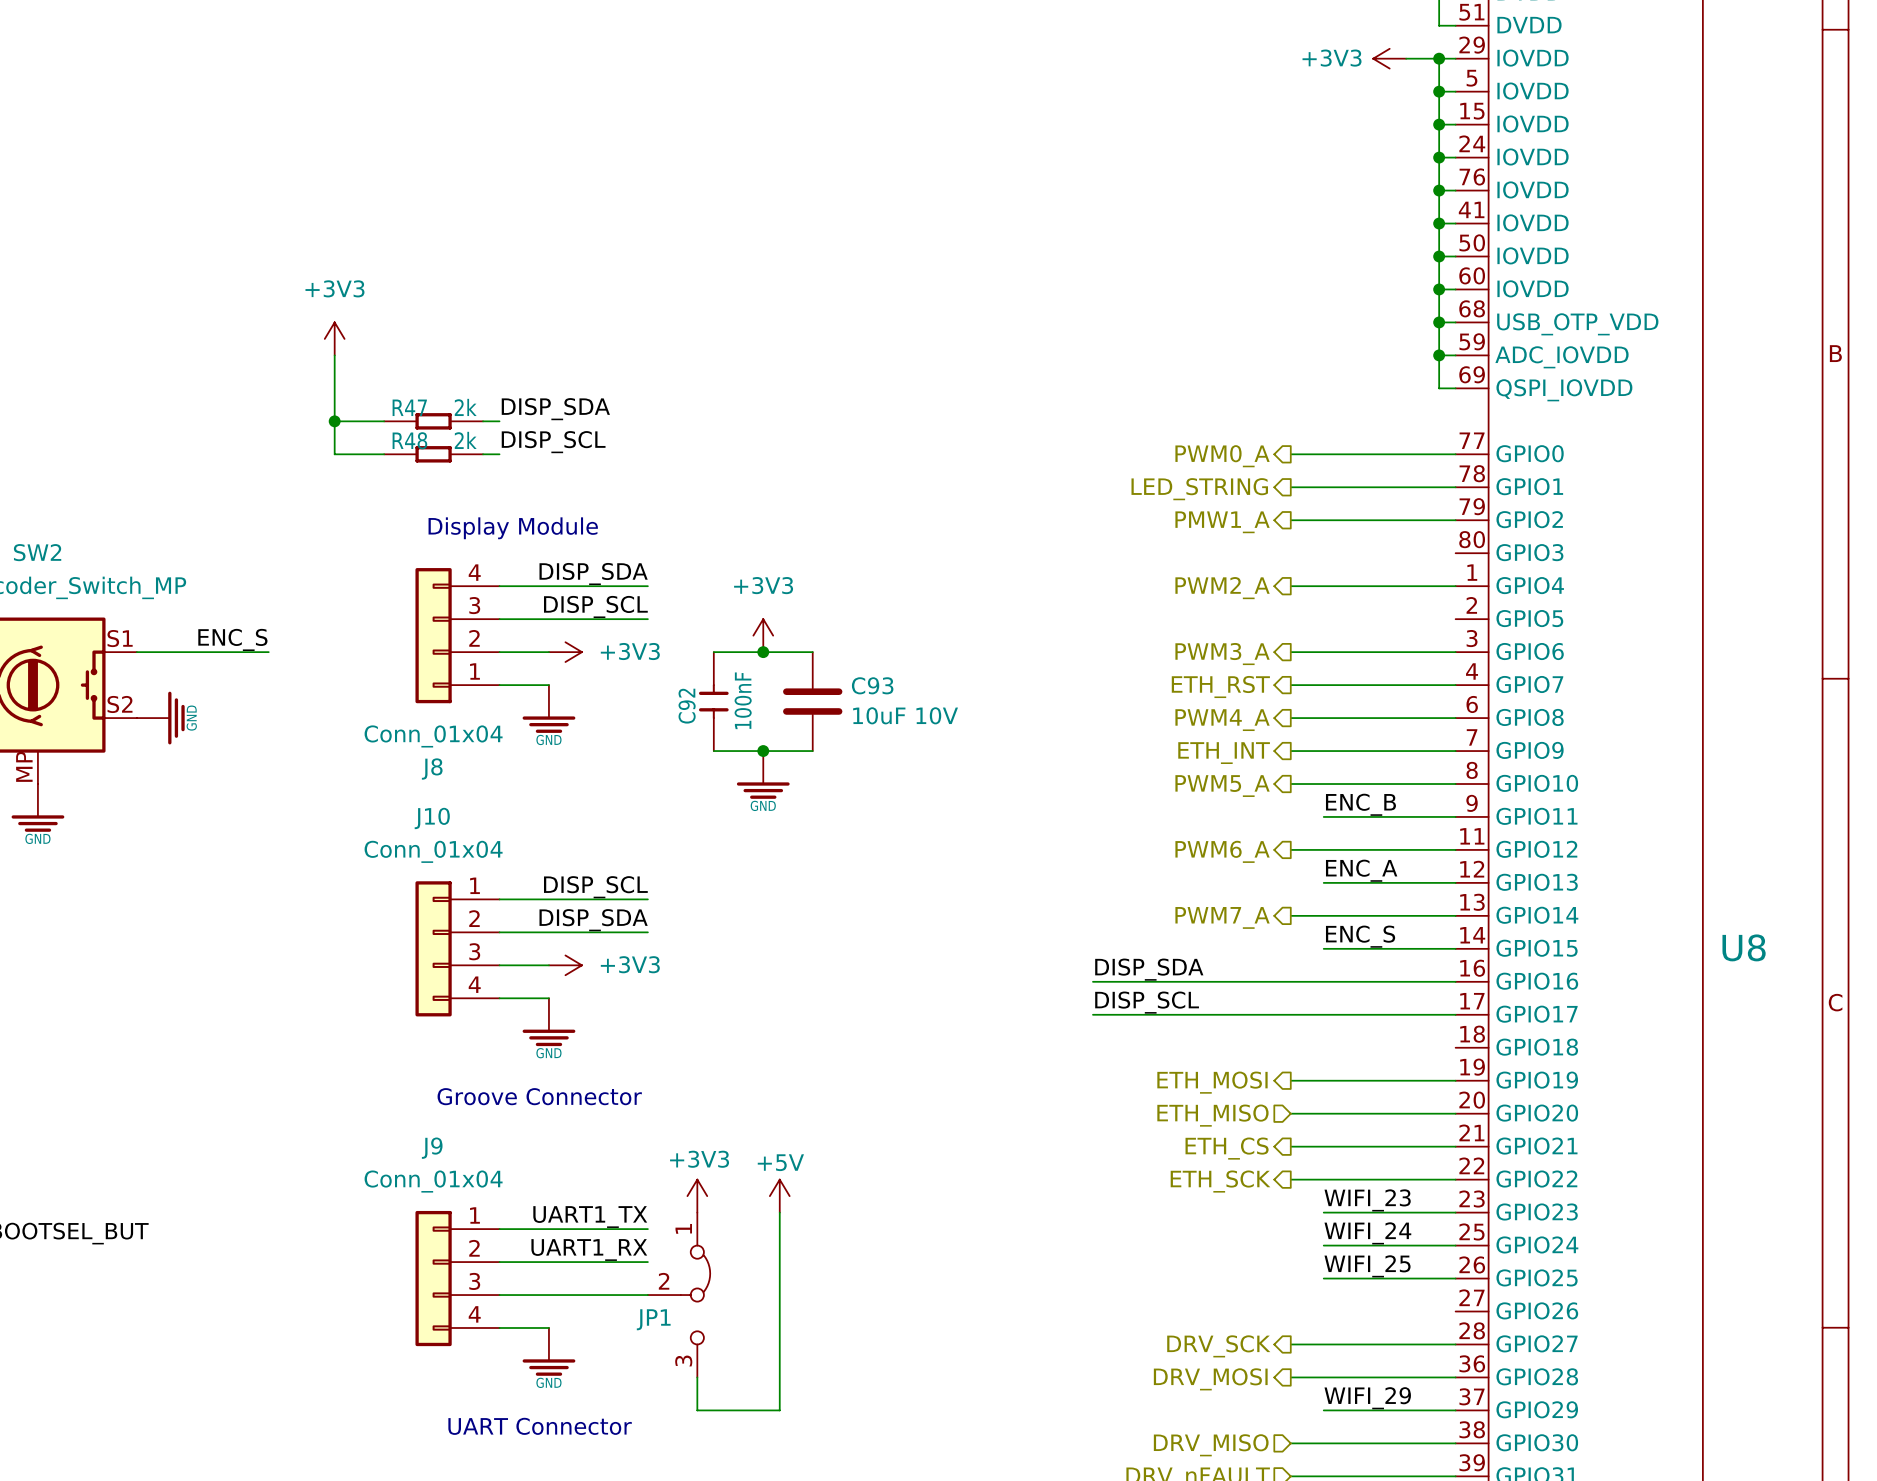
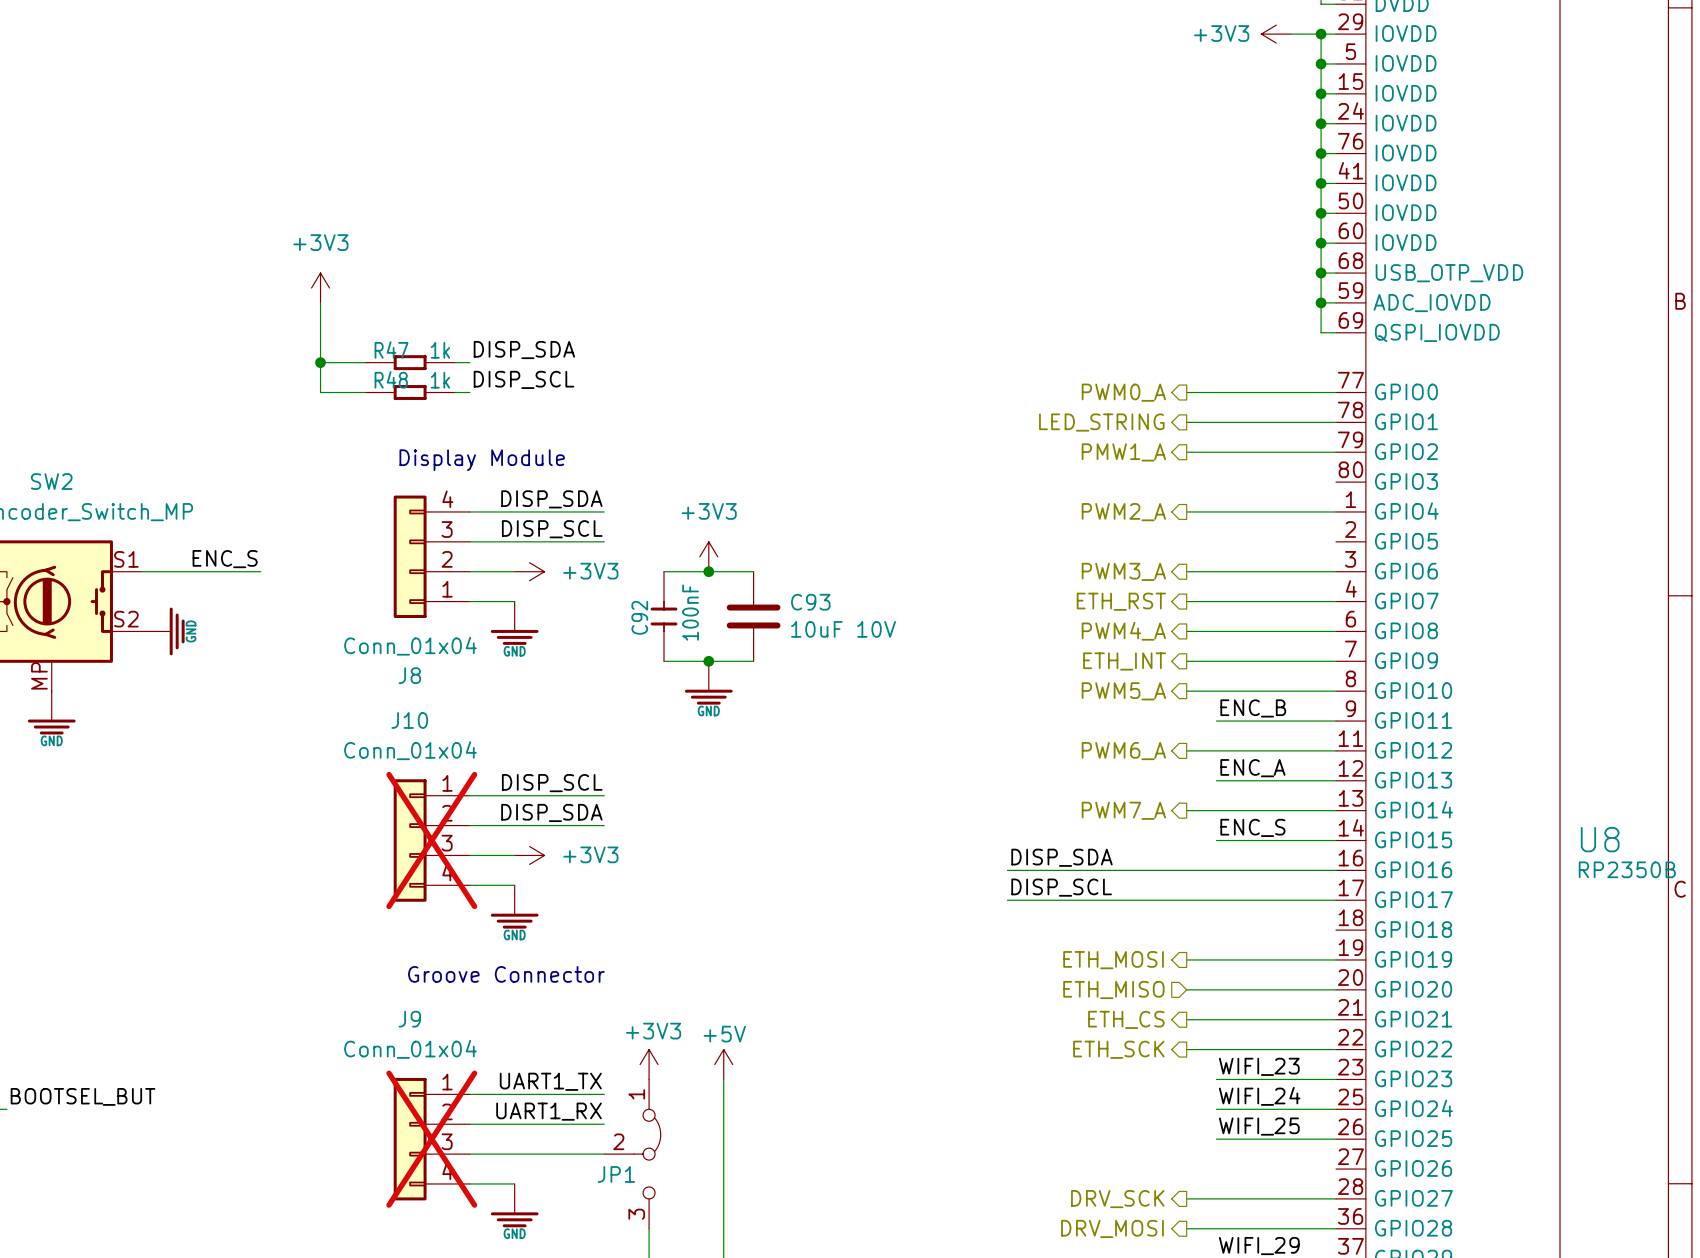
R47 value: 2k (465, 407) -> 1k (440, 350)
R48 value: 2k (465, 440) -> 1k (440, 380)
J10 do-not-place cross: none -> (431, 840)
U8 value: none -> RP2350B (1627, 869)
J9 do-not-place cross: none -> (431, 1139)

